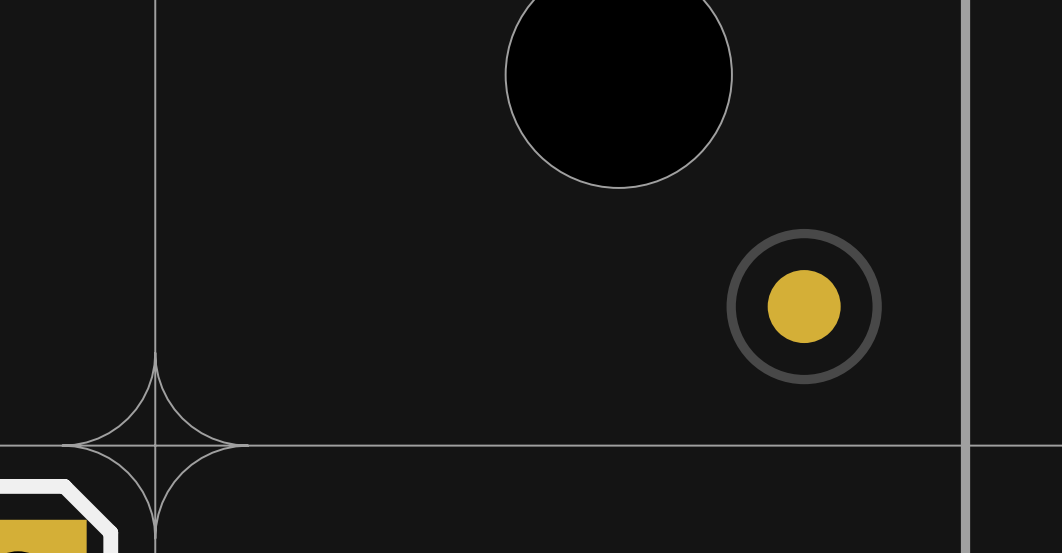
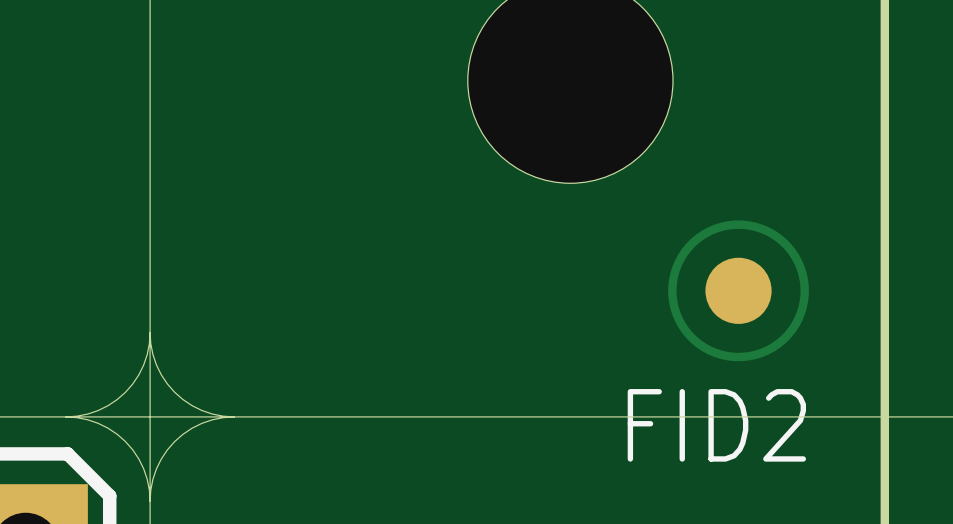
FID2 name: none -> FID2 (716, 425)

